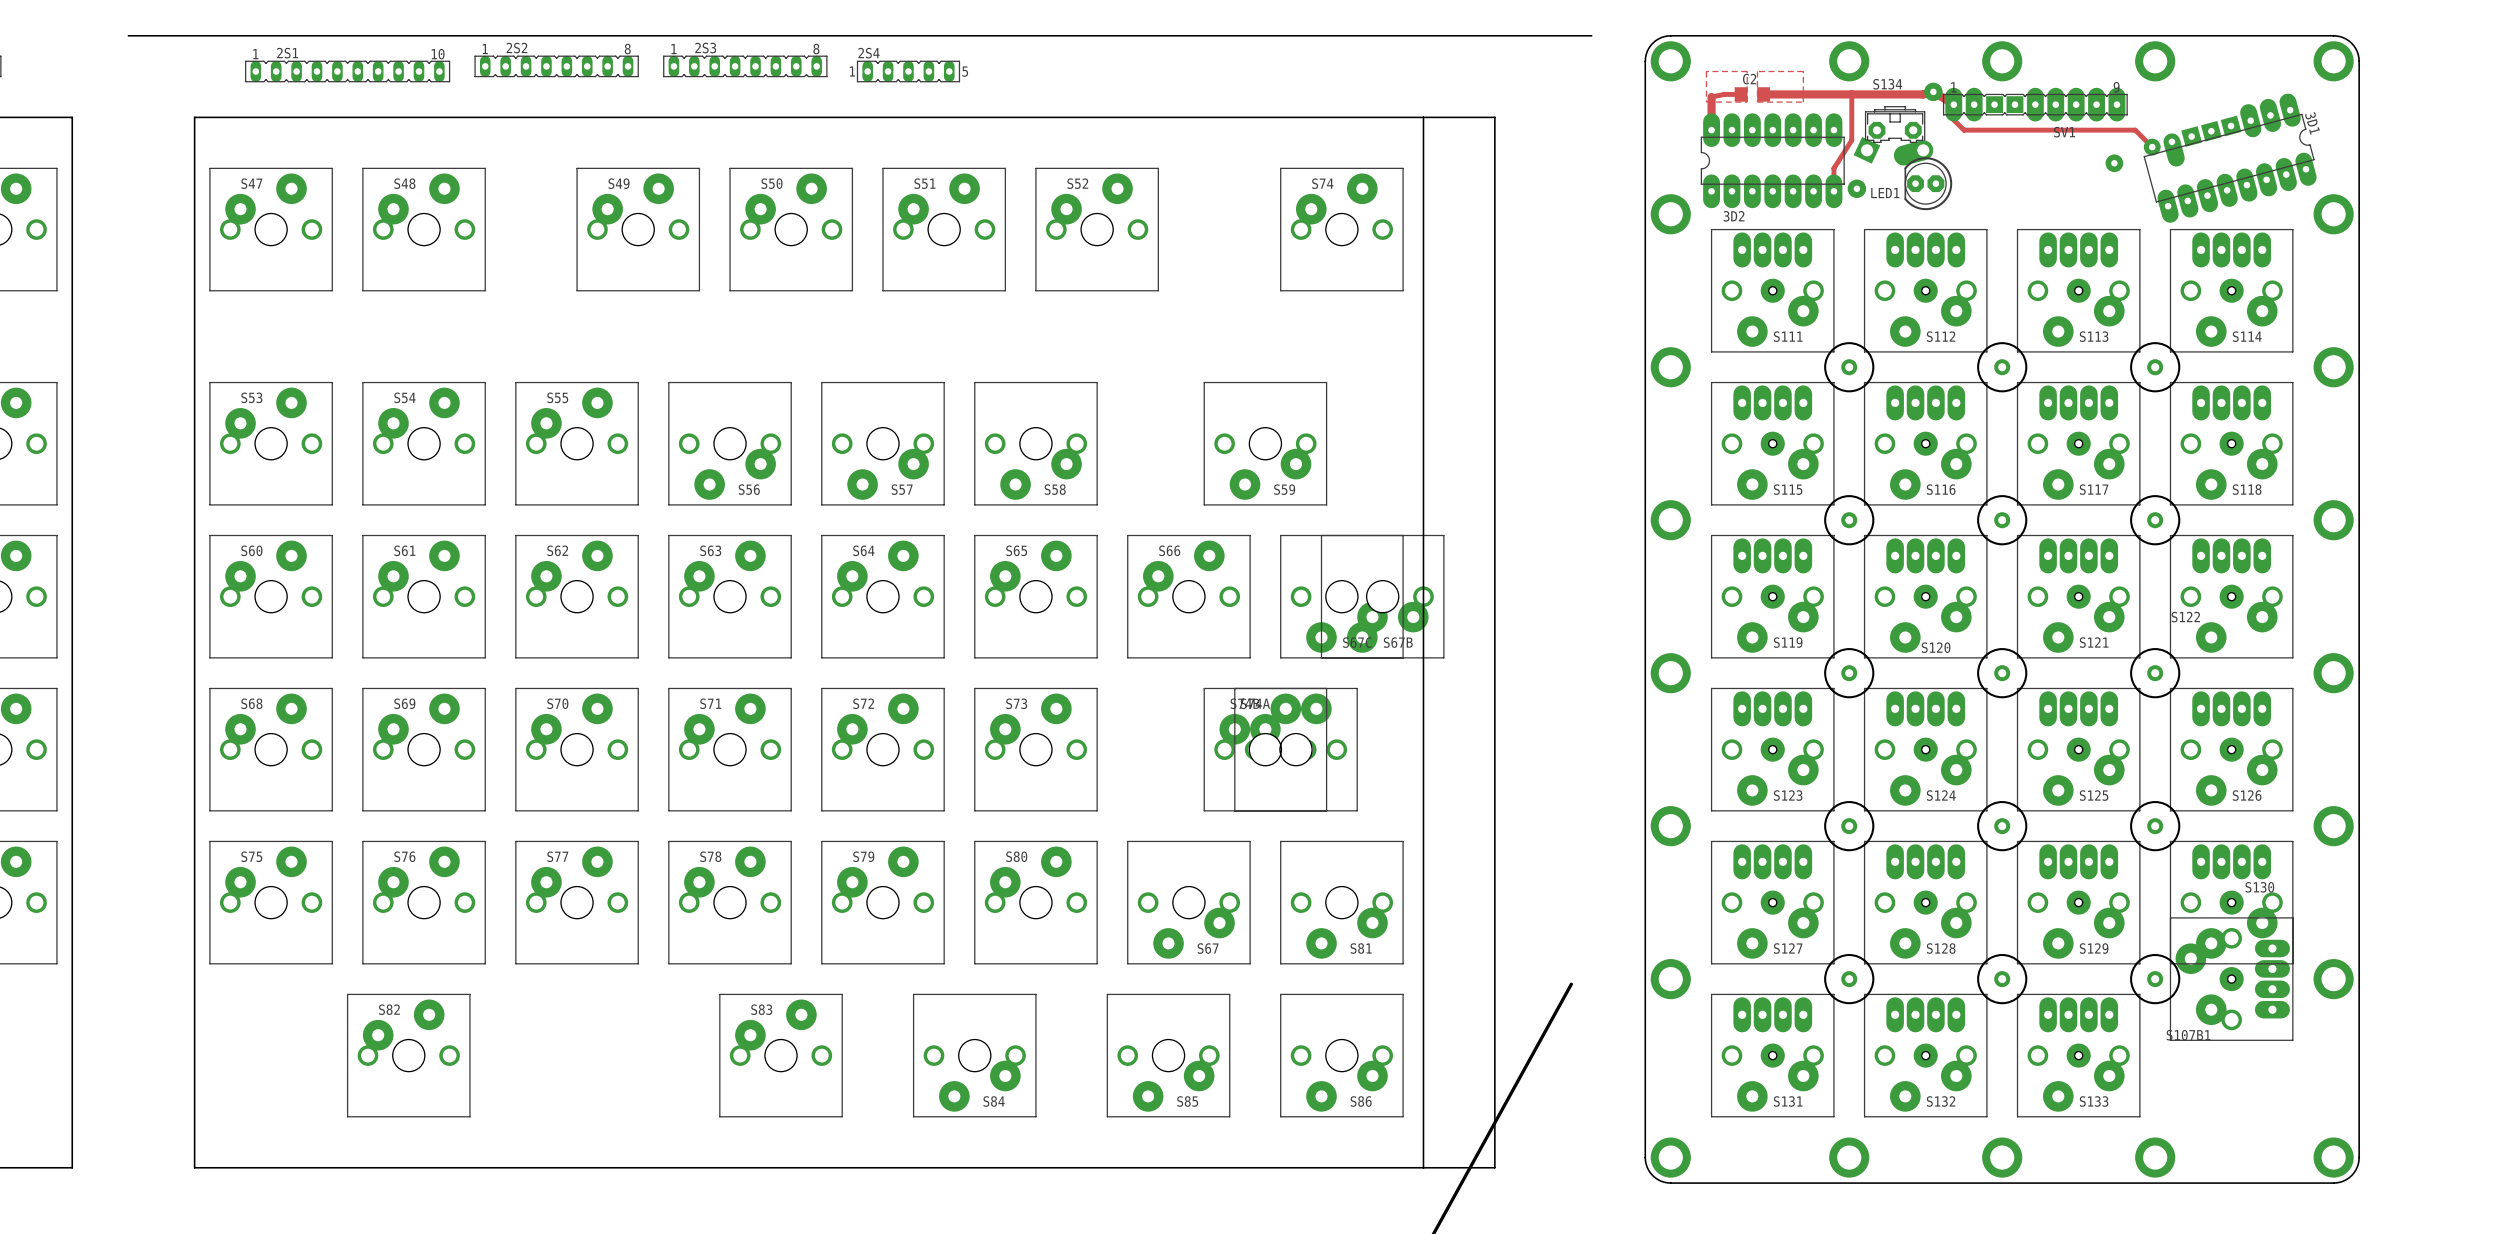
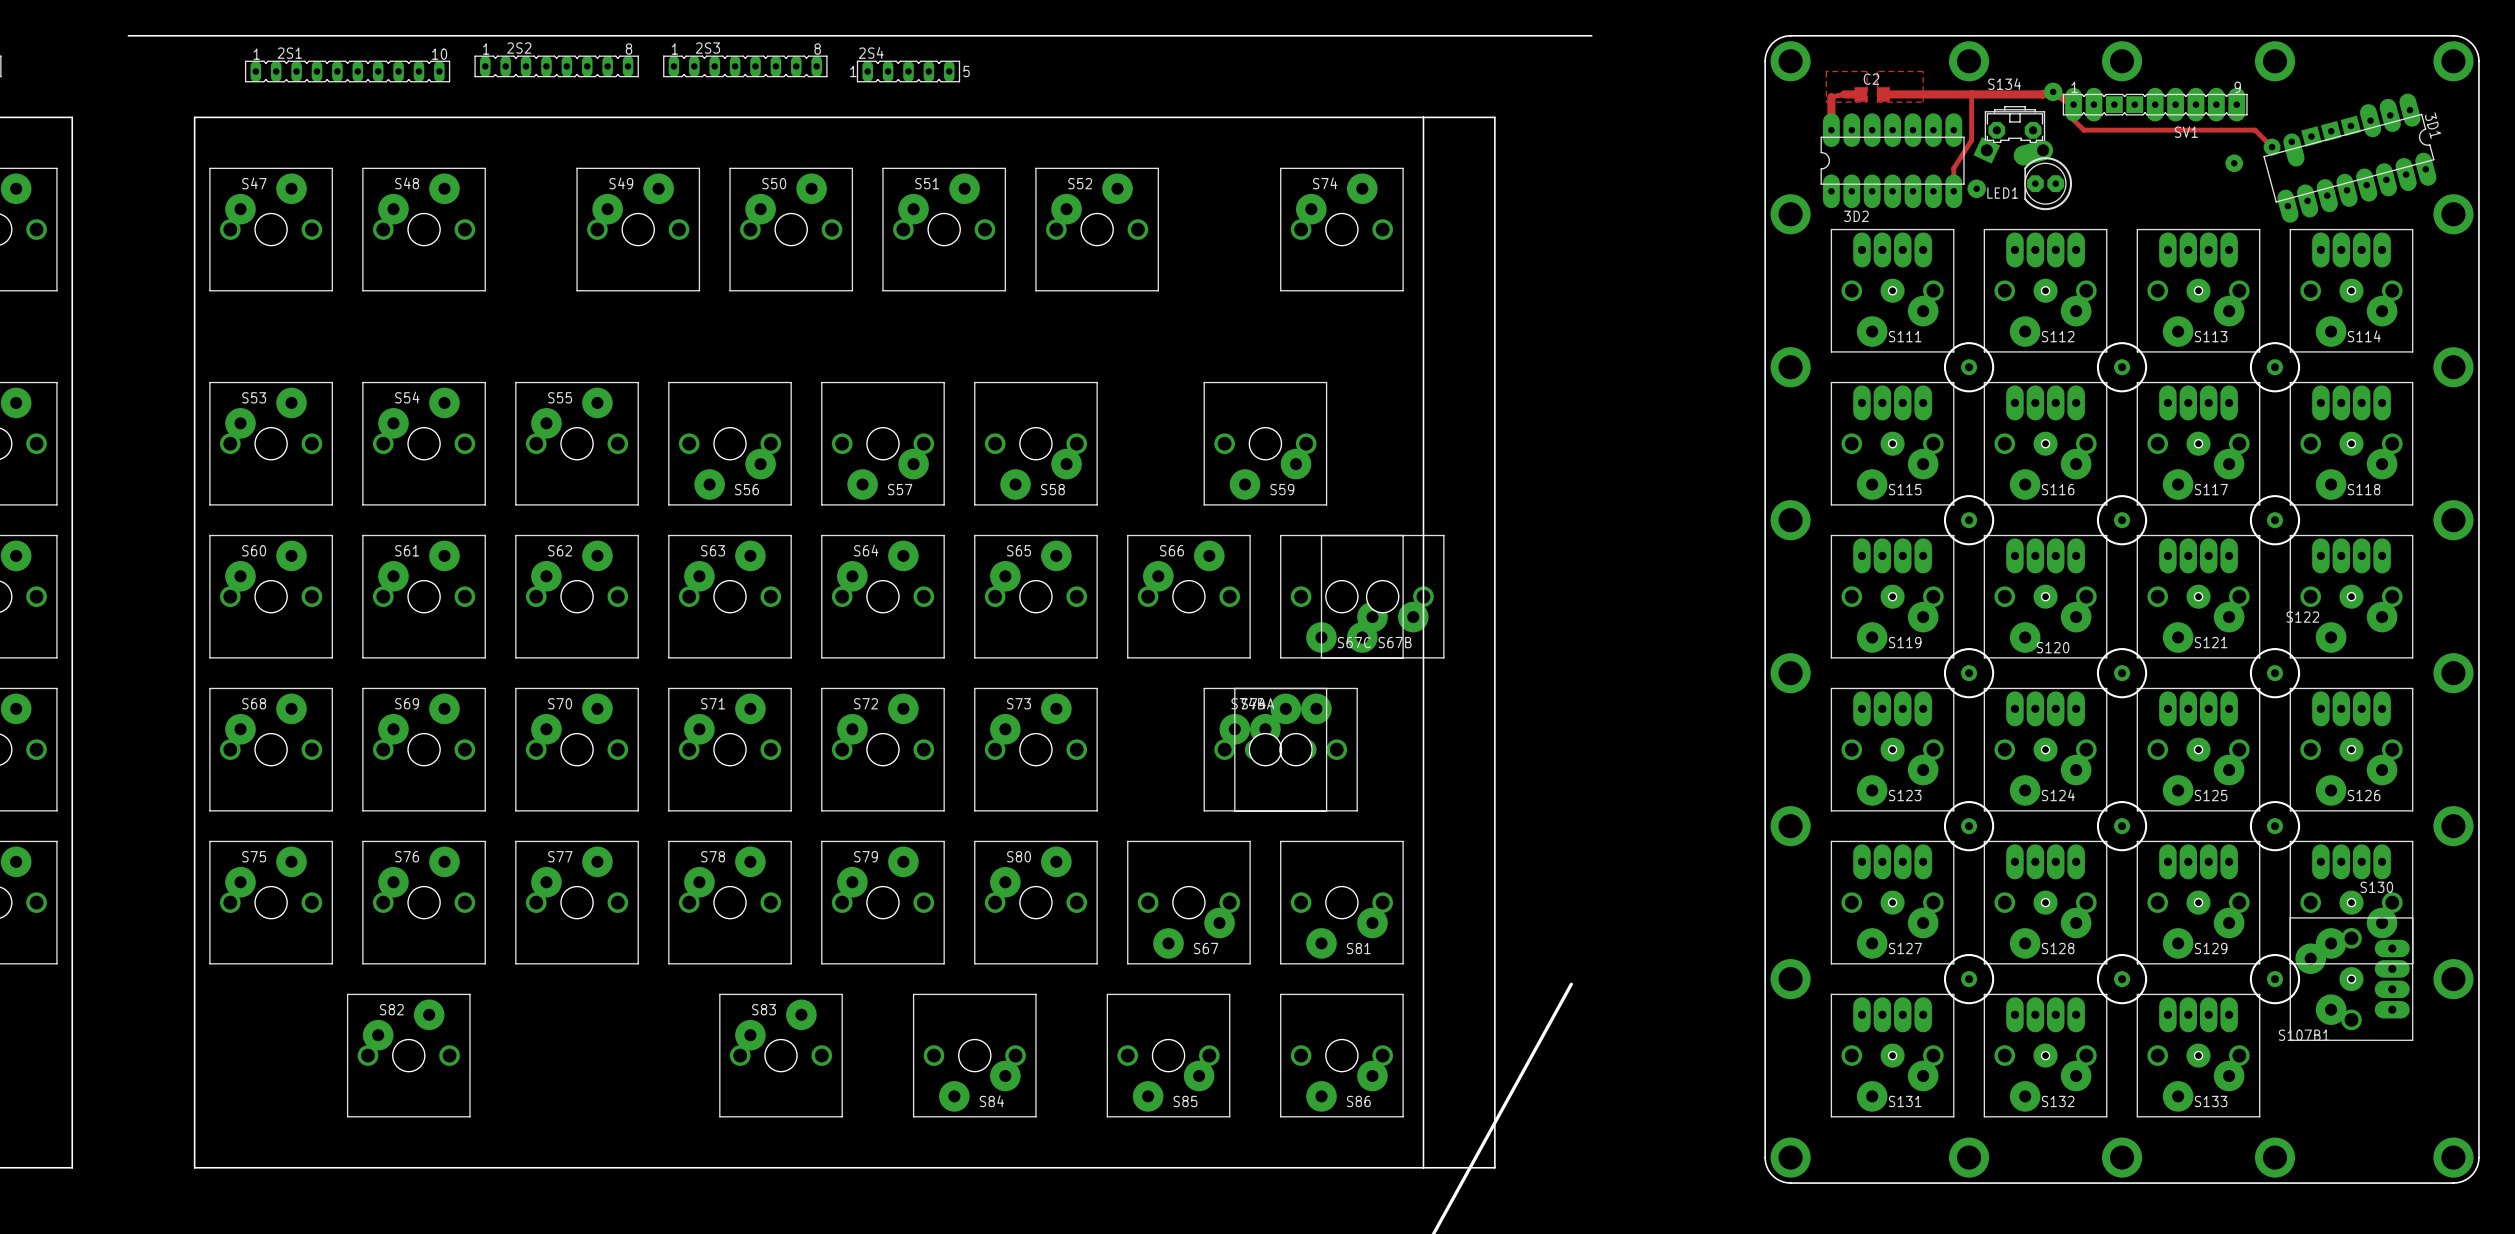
board edge: (1790, 35) (1667, 36) (1652, 43) (1647, 51) (1645, 61) (1645, 1160) (1652, 1175) (1667, 1182) (1790, 1183) -> (1790, 35) (1780, 37) (1772, 43) (1767, 51) (1765, 61) (1765, 1157) (1767, 1167) (1772, 1175) (1780, 1181) (1790, 1183)
board edge: (2333, 35) (2343, 37) (2351, 43) (2357, 51) (2359, 61) (2359, 1157) (2357, 1167) (2351, 1175) (2343, 1181) (2333, 1183) -> (2333, 35) (2456, 36) (2471, 43) (2477, 51) (2478, 61) (2478, 1160) (2471, 1175) (2456, 1182) (2333, 1183)
via: (1670, 61) -> none
via: none -> (1790, 61)
via: (1849, 61) -> none
via position: (2002, 61) -> (1969, 61)
via position: (2155, 61) -> (2122, 61)
via: none -> (2275, 61)
via: (2333, 61) -> none
via: none -> (2453, 61)
zone outline: (1706, 71) (1747, 71) (1747, 102) (1706, 102) (1706, 71) -> (1826, 71) (1867, 71) (1867, 102) (1826, 102) (1826, 71)
zone outline: (1757, 71) (1803, 71) (1803, 102) (1757, 102) (1757, 71) -> (1877, 71) (1923, 71) (1923, 102) (1877, 102) (1877, 71)
via: (1933, 91) -> none
via: none -> (2053, 91)
3D1 footprint: [2143, 93, 2317, 223] -> [2263, 93, 2437, 223]
track: (1741, 94) (1711, 96) (1711, 130) -> none
C2 position: (1752, 94) -> (1872, 94)
track: (1763, 94) (1844, 94) -> (1831, 130) (1831, 96) (1844, 94)
track: (1851, 94) (1851, 140) (1833, 168) (1833, 191) -> (1971, 94) (1971, 140) (1953, 168) (1953, 191)
track: (1860, 94) (1883, 94) -> none
track: (1923, 94) (1933, 91) (1953, 104) (1953, 119) (1963, 130) (2083, 130) -> (1923, 94) (2043, 94) (2053, 91) (2073, 104) (2073, 119) (2083, 130)
SV1 position: (2035, 104) -> (2155, 104)
track: (2135, 130) (2152, 147) -> (2135, 130) (2255, 130) (2272, 147)
S134 position: (1893, 135) -> (2013, 135)
3D2 position: (1772, 160) -> (1892, 160)
via: (2114, 163) -> none
via: none -> (2234, 163)
LED1 position: (1928, 183) -> (2048, 183)
via: (1856, 188) -> none
via: none -> (1976, 188)
via: (1670, 214) -> none
via: none -> (1790, 214)
via: (2333, 214) -> none
via: none -> (2453, 214)
S111 position: (1772, 290) -> (1892, 290)
S112 position: (1925, 290) -> (2045, 290)
S113 position: (2078, 290) -> (2198, 290)
S114 position: (2231, 290) -> (2351, 290)
round board edge: [1824, 342, 1875, 393] -> none
round board edge: none -> [2249, 342, 2301, 393]
via: (1670, 367) -> none
via: none -> (1790, 367)
via: (1849, 367) -> none
round board edge position: (2002, 367) -> (1969, 367)
via position: (2002, 367) -> (1969, 367)
round board edge position: (2155, 367) -> (2122, 367)
via position: (2155, 367) -> (2122, 367)
via: none -> (2275, 367)
via: (2333, 367) -> none
via: none -> (2453, 367)
S115 position: (1772, 443) -> (1892, 443)
S116 position: (1925, 443) -> (2045, 443)
S117 position: (2078, 443) -> (2198, 443)
S118 position: (2231, 443) -> (2351, 443)
round board edge: [1824, 495, 1875, 546] -> none
round board edge: none -> [2249, 495, 2301, 546]
via: (1670, 520) -> none
via: none -> (1790, 520)
via: (1849, 520) -> none
round board edge position: (2002, 520) -> (1969, 520)
via position: (2002, 520) -> (1969, 520)
round board edge position: (2155, 520) -> (2122, 520)
via position: (2155, 520) -> (2122, 520)
via: none -> (2275, 520)
via: (2333, 520) -> none
via: none -> (2453, 520)
S119 position: (1772, 596) -> (1892, 596)
S120 position: (1925, 596) -> (2045, 596)
S121 position: (2078, 596) -> (2198, 596)
S122 position: (2231, 596) -> (2351, 596)
round board edge: [1824, 648, 1875, 699] -> none
round board edge: none -> [2249, 648, 2301, 699]
via: (1670, 673) -> none
via: none -> (1790, 673)
via: (1849, 673) -> none
round board edge position: (2002, 673) -> (1969, 673)
via position: (2002, 673) -> (1969, 673)
round board edge position: (2155, 673) -> (2122, 673)
via position: (2155, 673) -> (2122, 673)
via: none -> (2275, 673)
via: (2333, 673) -> none
via: none -> (2453, 673)
S123 position: (1772, 749) -> (1892, 749)
S124 position: (1925, 749) -> (2045, 749)
S125 position: (2078, 749) -> (2198, 749)
S126 position: (2231, 749) -> (2351, 749)
round board edge: [1824, 801, 1875, 852] -> none
round board edge: none -> [2249, 801, 2301, 852]
via: (1670, 826) -> none
via: none -> (1790, 826)
via: (1849, 826) -> none
round board edge position: (2002, 826) -> (1969, 826)
via position: (2002, 826) -> (1969, 826)
round board edge position: (2155, 826) -> (2122, 826)
via position: (2155, 826) -> (2122, 826)
via: none -> (2275, 826)
via: (2333, 826) -> none
via: none -> (2453, 826)
S127 position: (1772, 902) -> (1892, 902)
S128 position: (1925, 902) -> (2045, 902)
S129 position: (2078, 902) -> (2198, 902)
S130 position: (2231, 902) -> (2351, 902)
round board edge: [1824, 954, 1875, 1005] -> none
round board edge: none -> [2249, 954, 2301, 1005]
via: (1670, 979) -> none
via: none -> (1790, 979)
via: (1849, 979) -> none
round board edge position: (2002, 979) -> (1969, 979)
via position: (2002, 979) -> (1969, 979)
round board edge position: (2155, 979) -> (2122, 979)
via position: (2155, 979) -> (2122, 979)
S107B1 position: (2231, 979) -> (2351, 979)
via: none -> (2275, 979)
via: (2333, 979) -> none
via: none -> (2453, 979)
S131 position: (1772, 1055) -> (1892, 1055)
S132 position: (1925, 1055) -> (2045, 1055)
S133 position: (2078, 1055) -> (2198, 1055)
via: (1670, 1157) -> none
via: none -> (1790, 1157)
via: (1849, 1157) -> none
via position: (2002, 1157) -> (1969, 1157)
via position: (2155, 1157) -> (2122, 1157)
via: none -> (2275, 1157)
via: (2333, 1157) -> none
via: none -> (2453, 1157)

